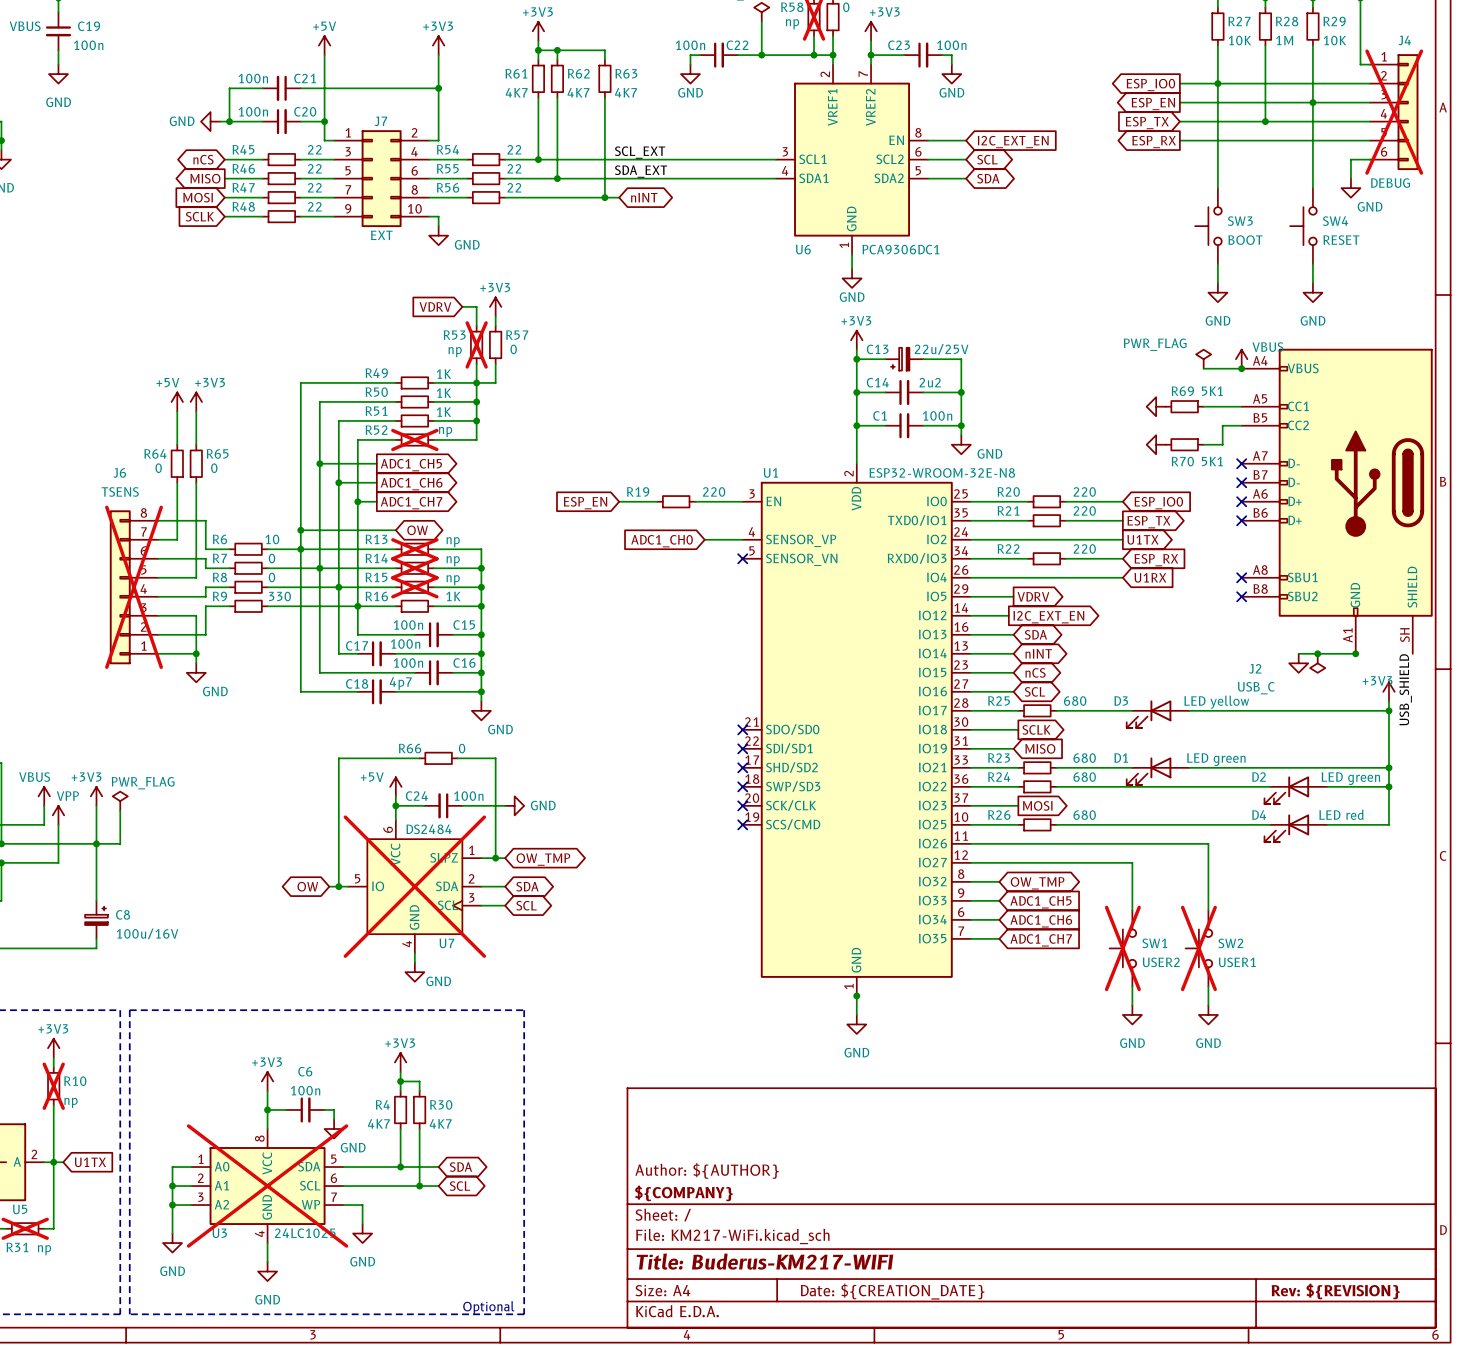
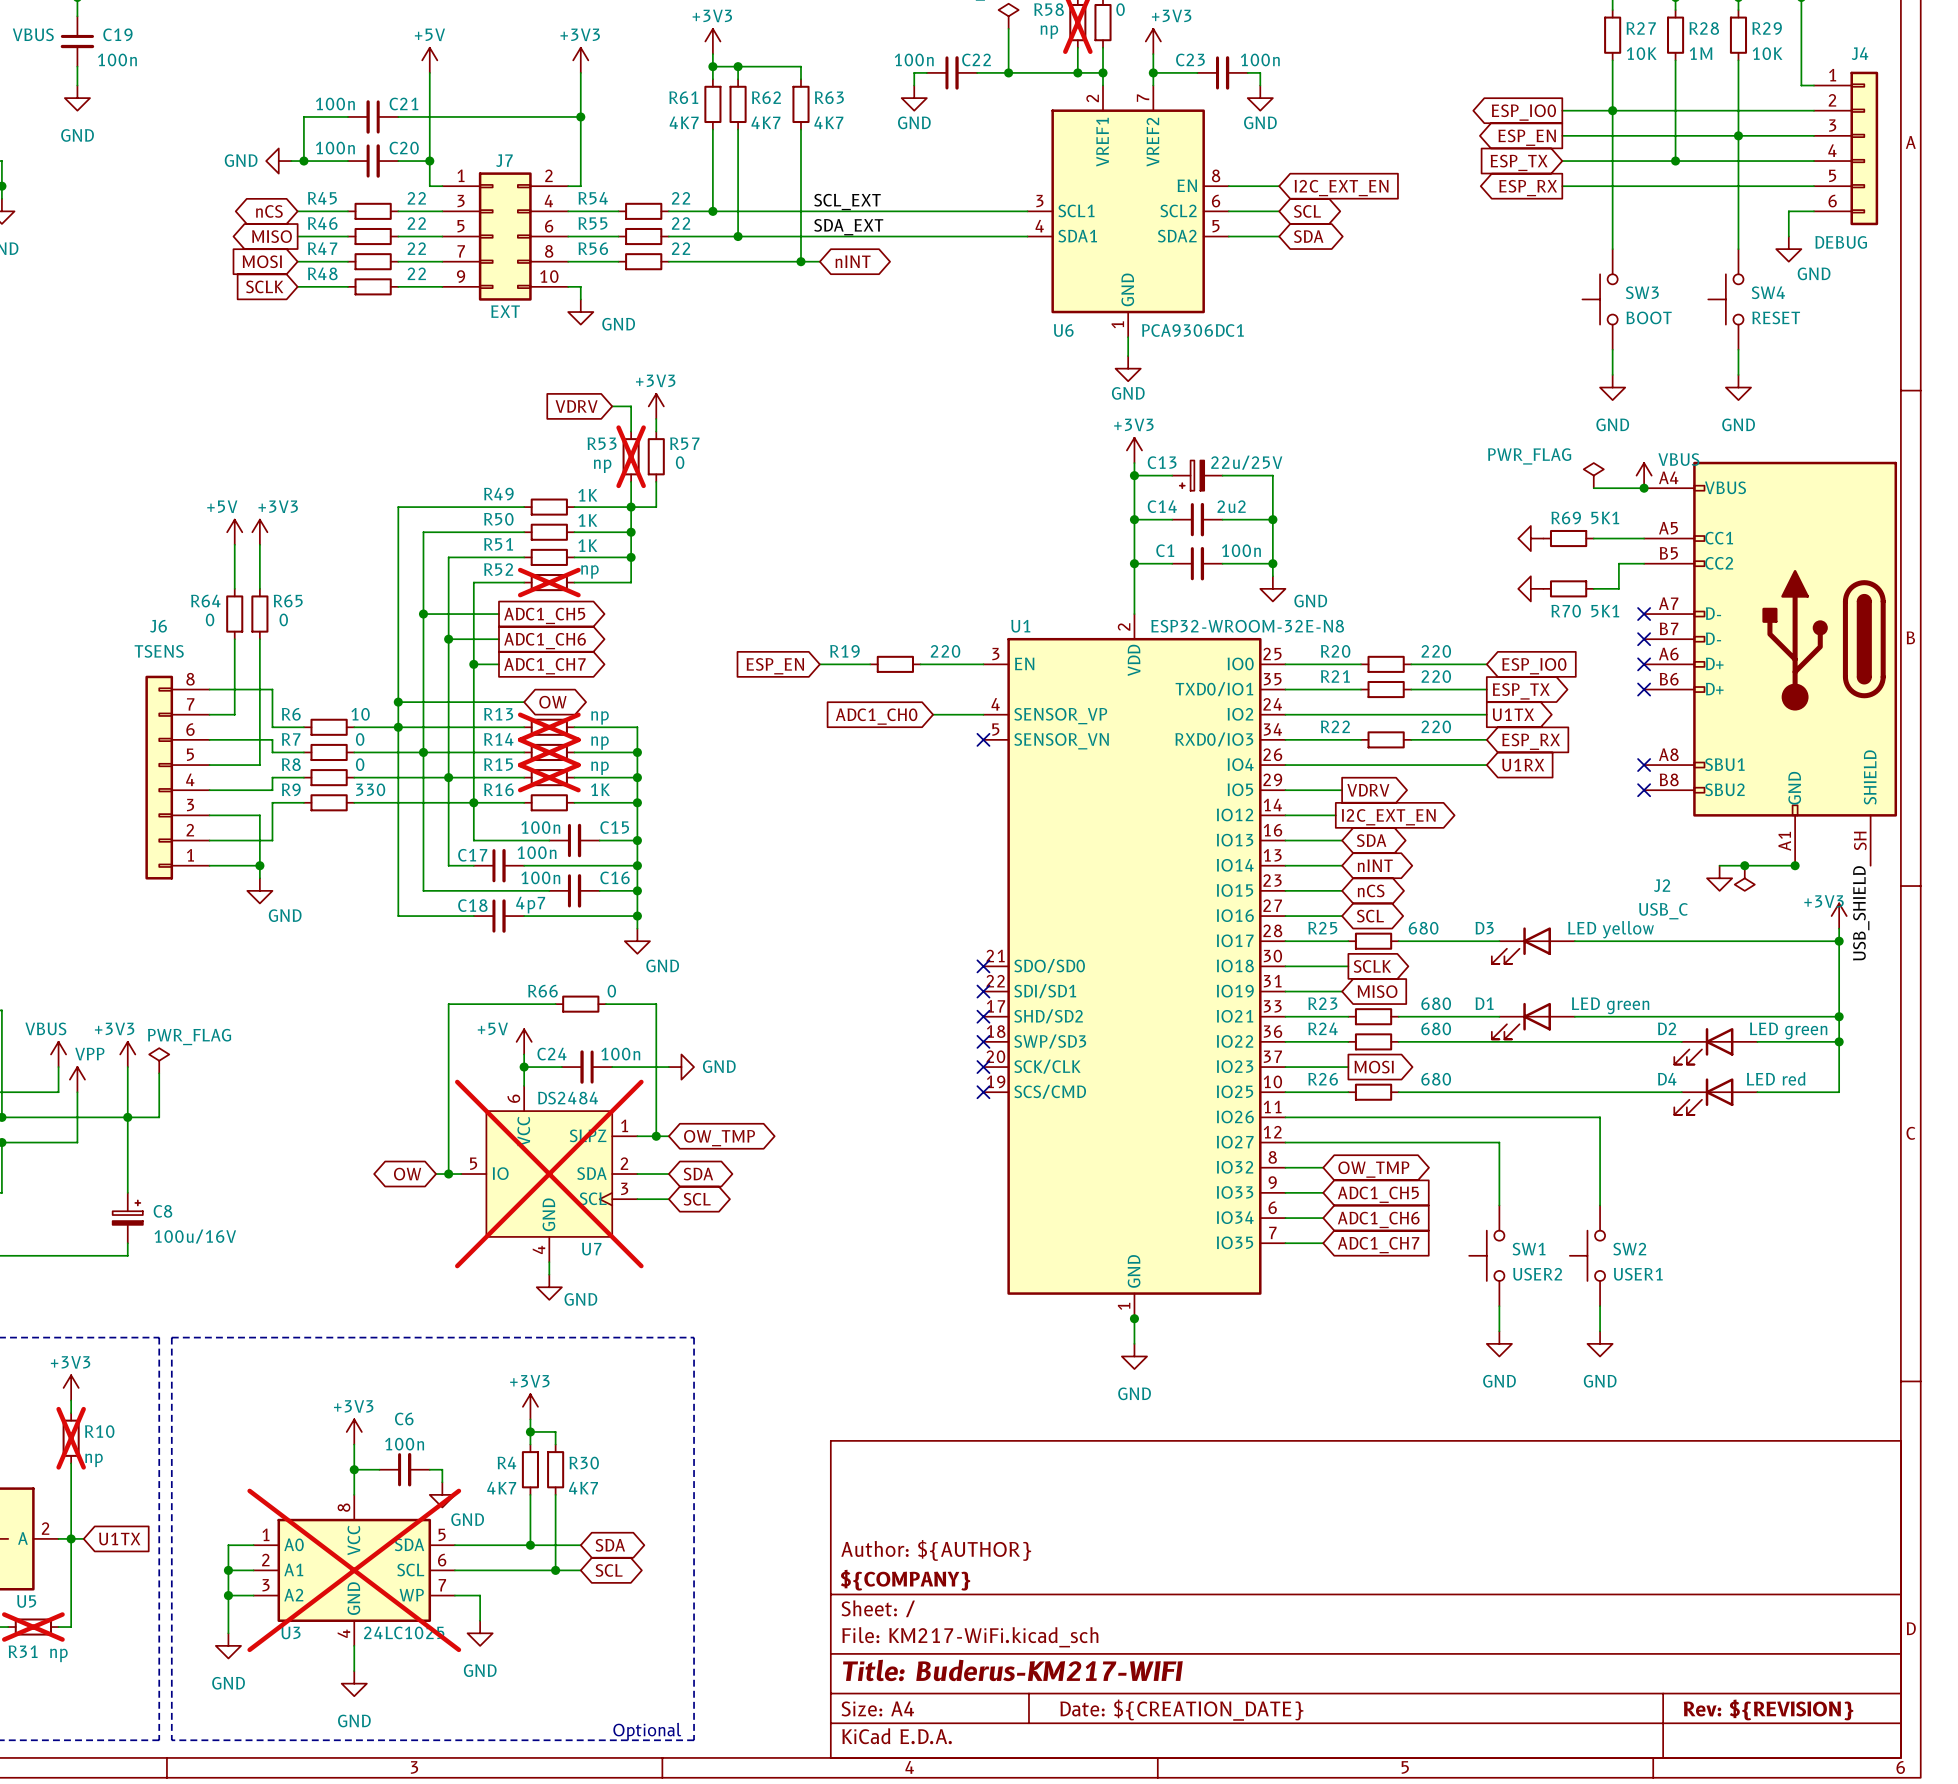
J4 do-not-place cross: (1394, 112) -> none
J6 do-not-place cross: (134, 587) -> none
SW1 do-not-place cross: (1122, 948) -> none
SW2 do-not-place cross: (1198, 948) -> none

